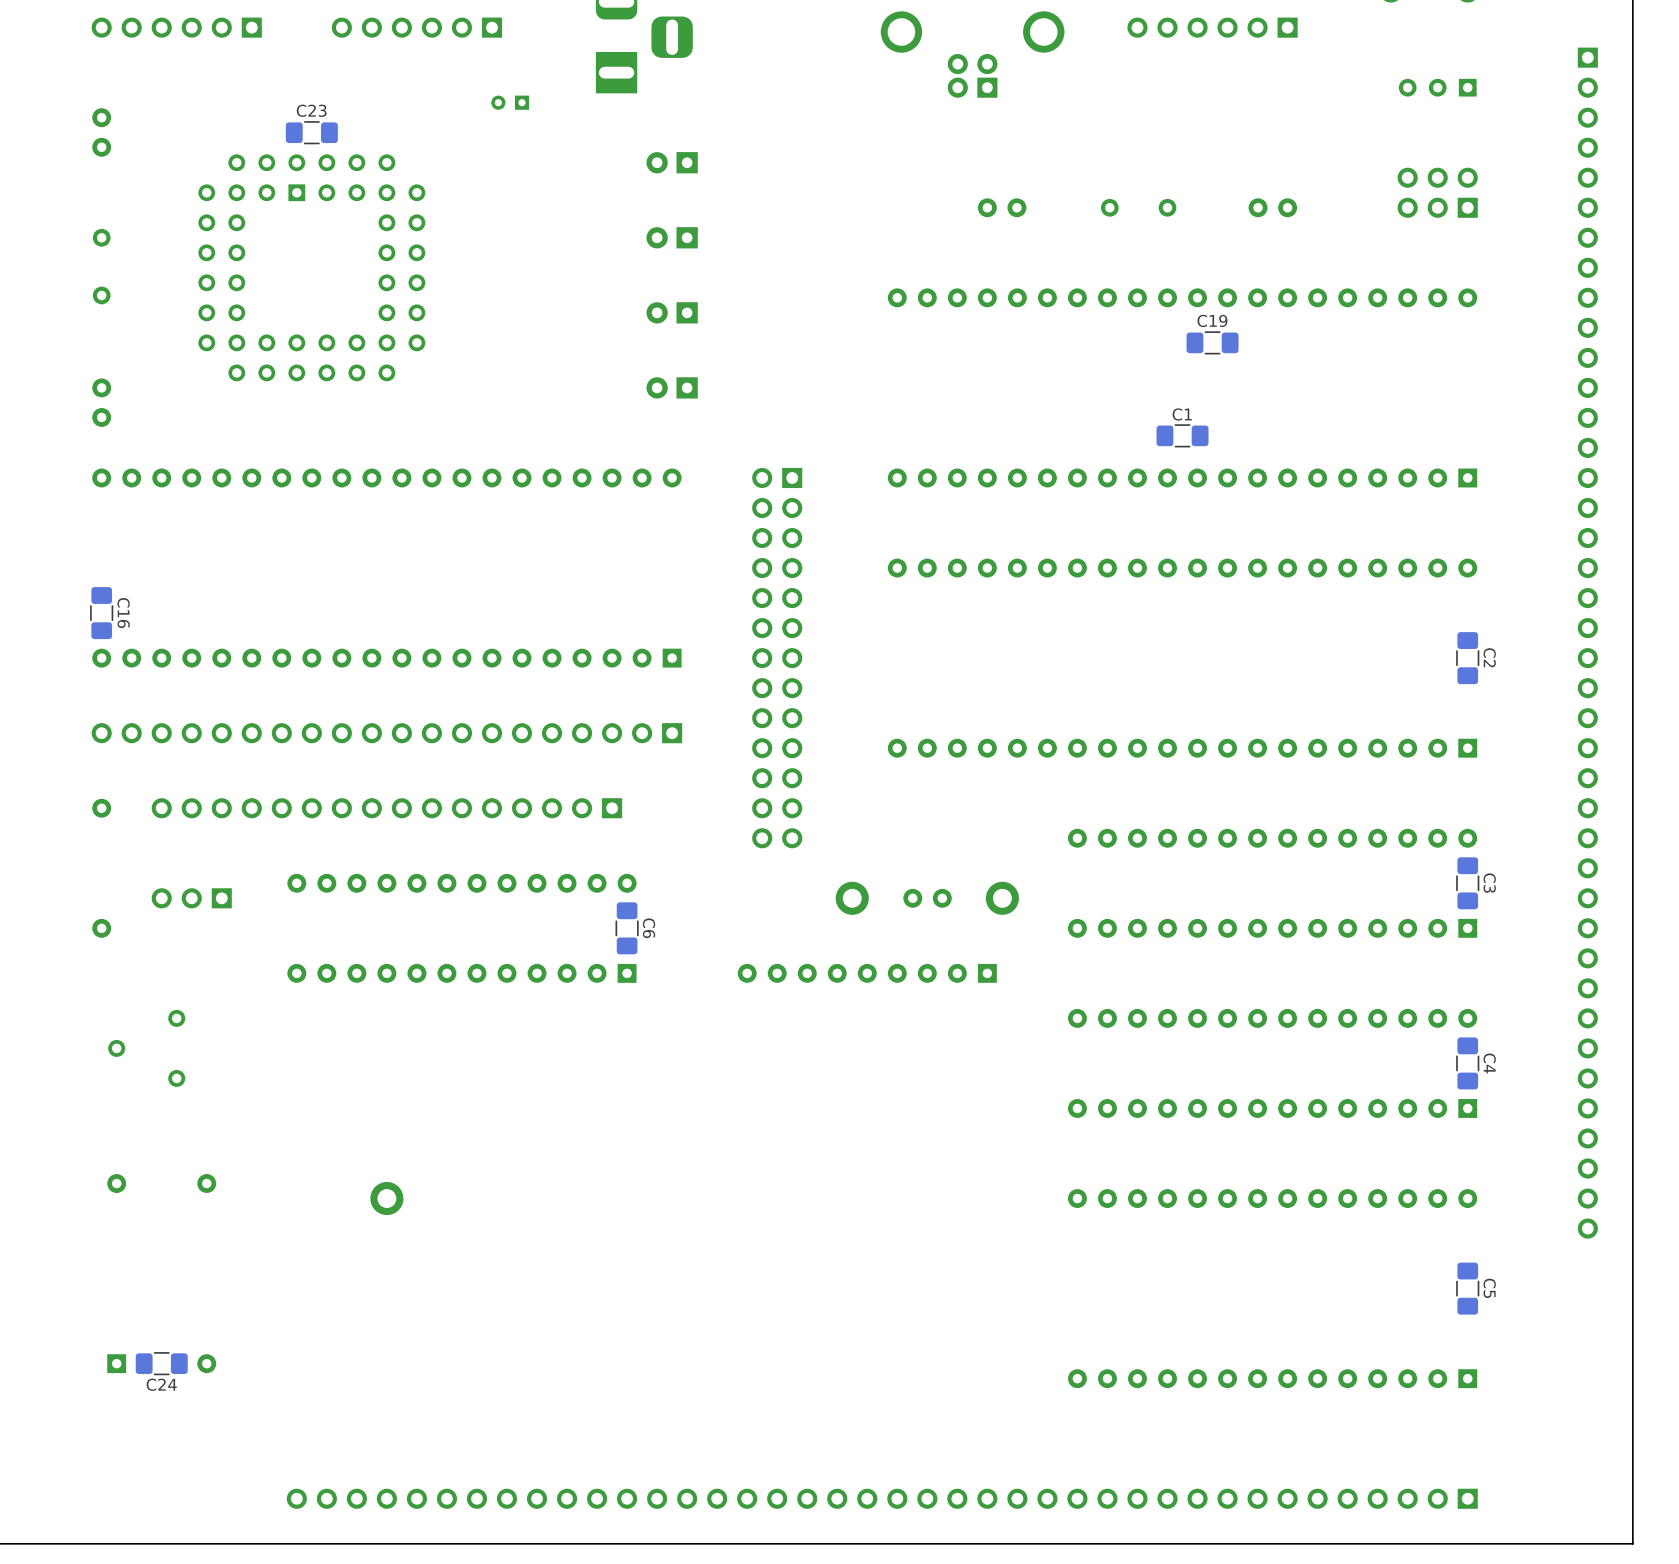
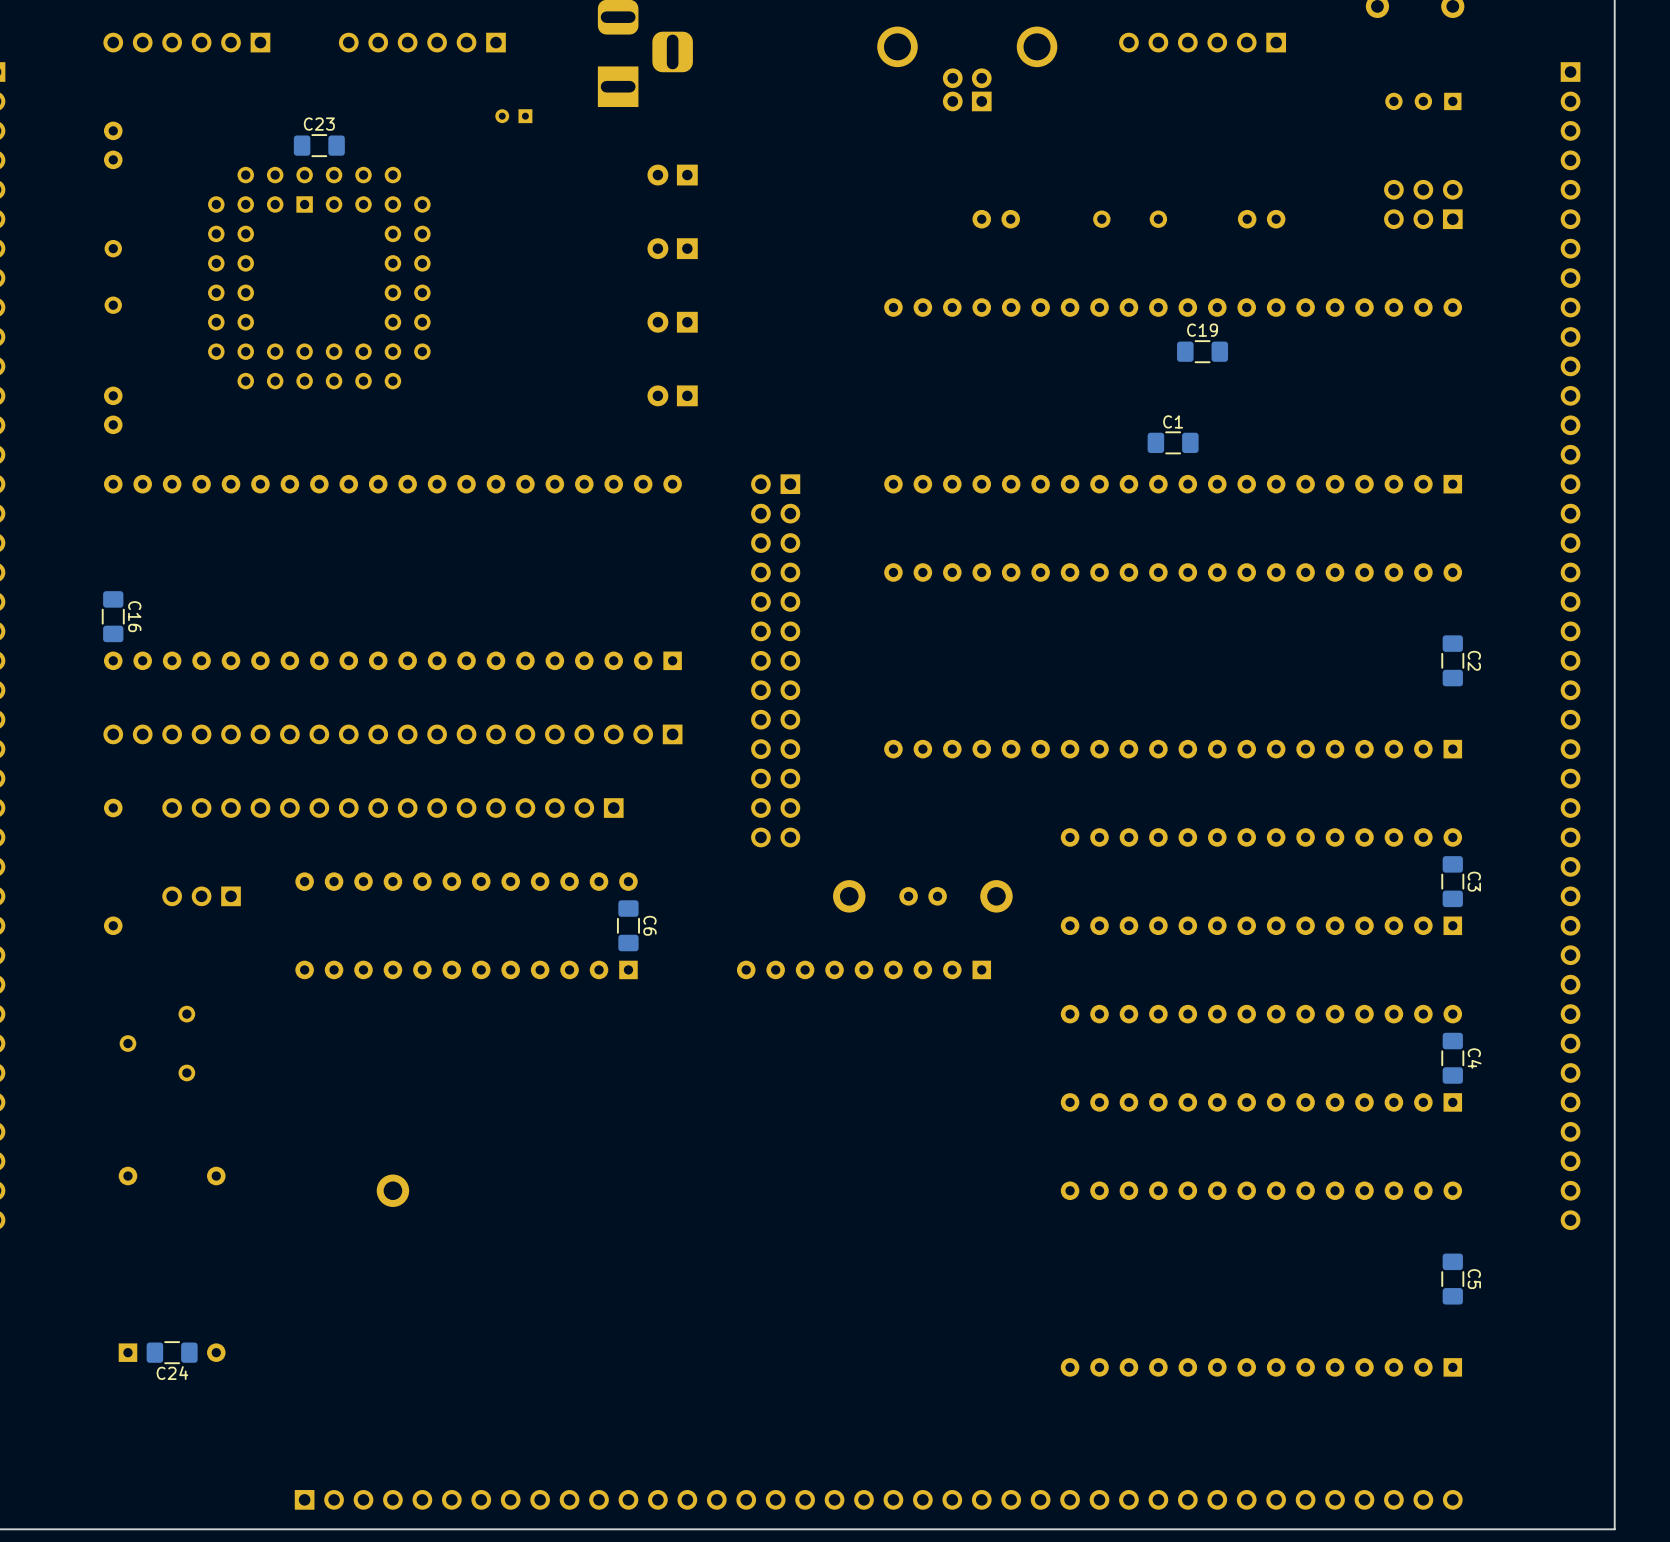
part rotation: 0° (882, 1498) -> 180° (878, 1499)

